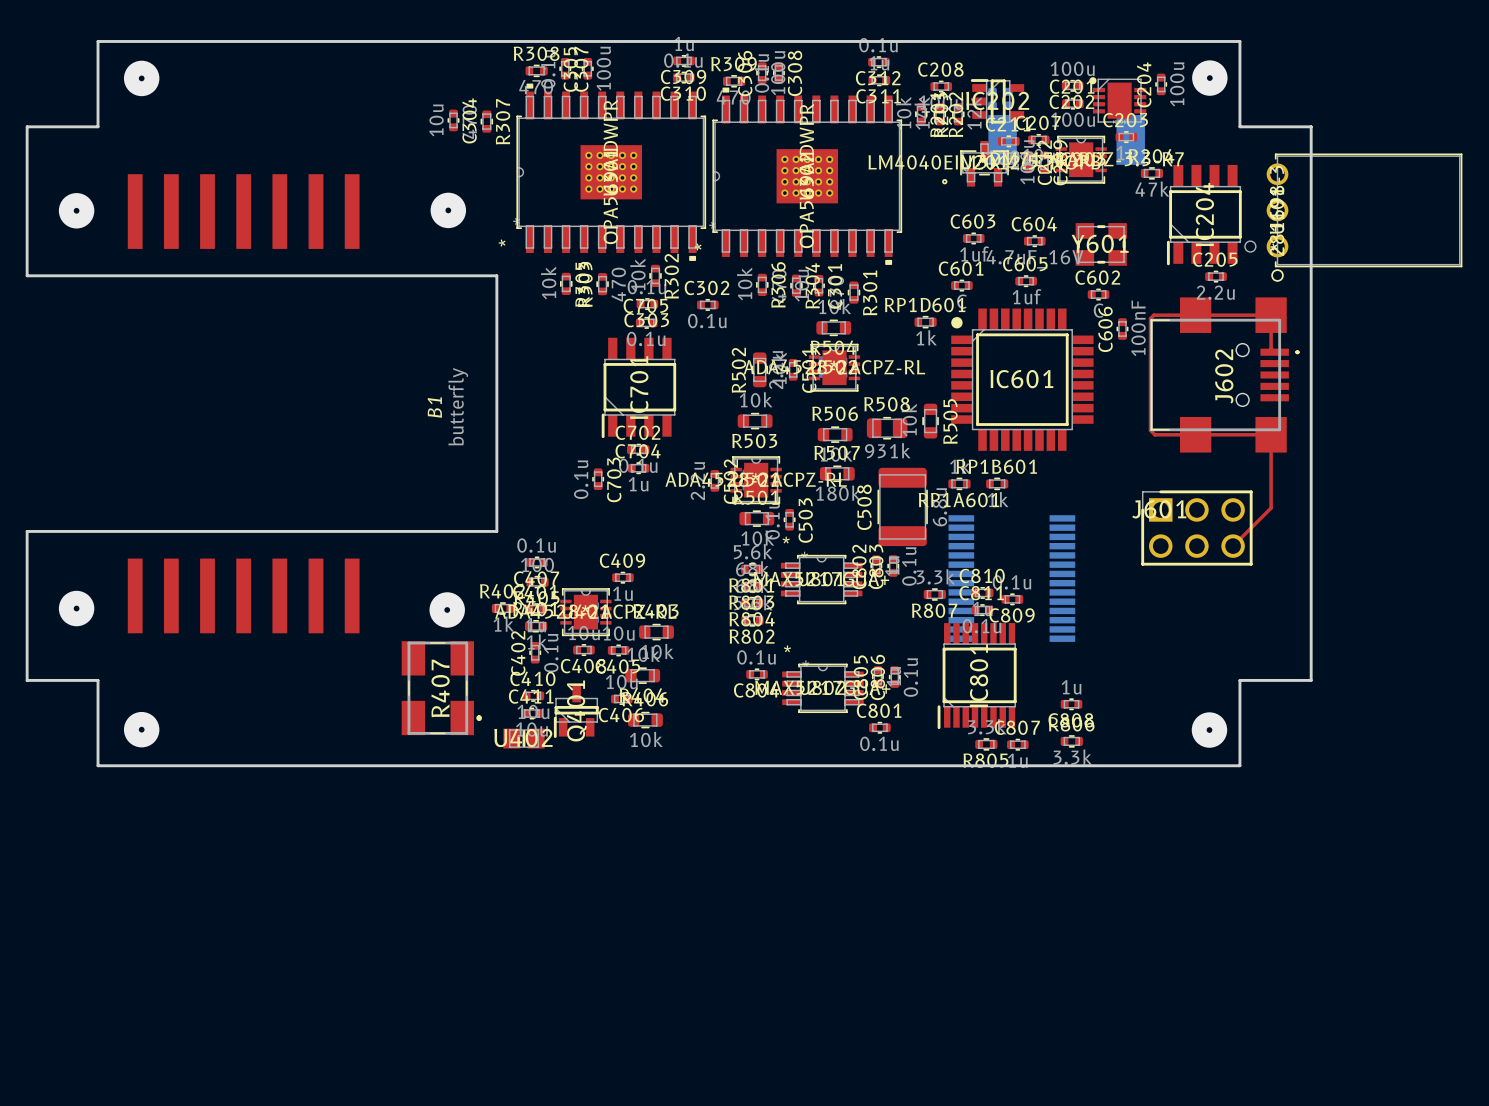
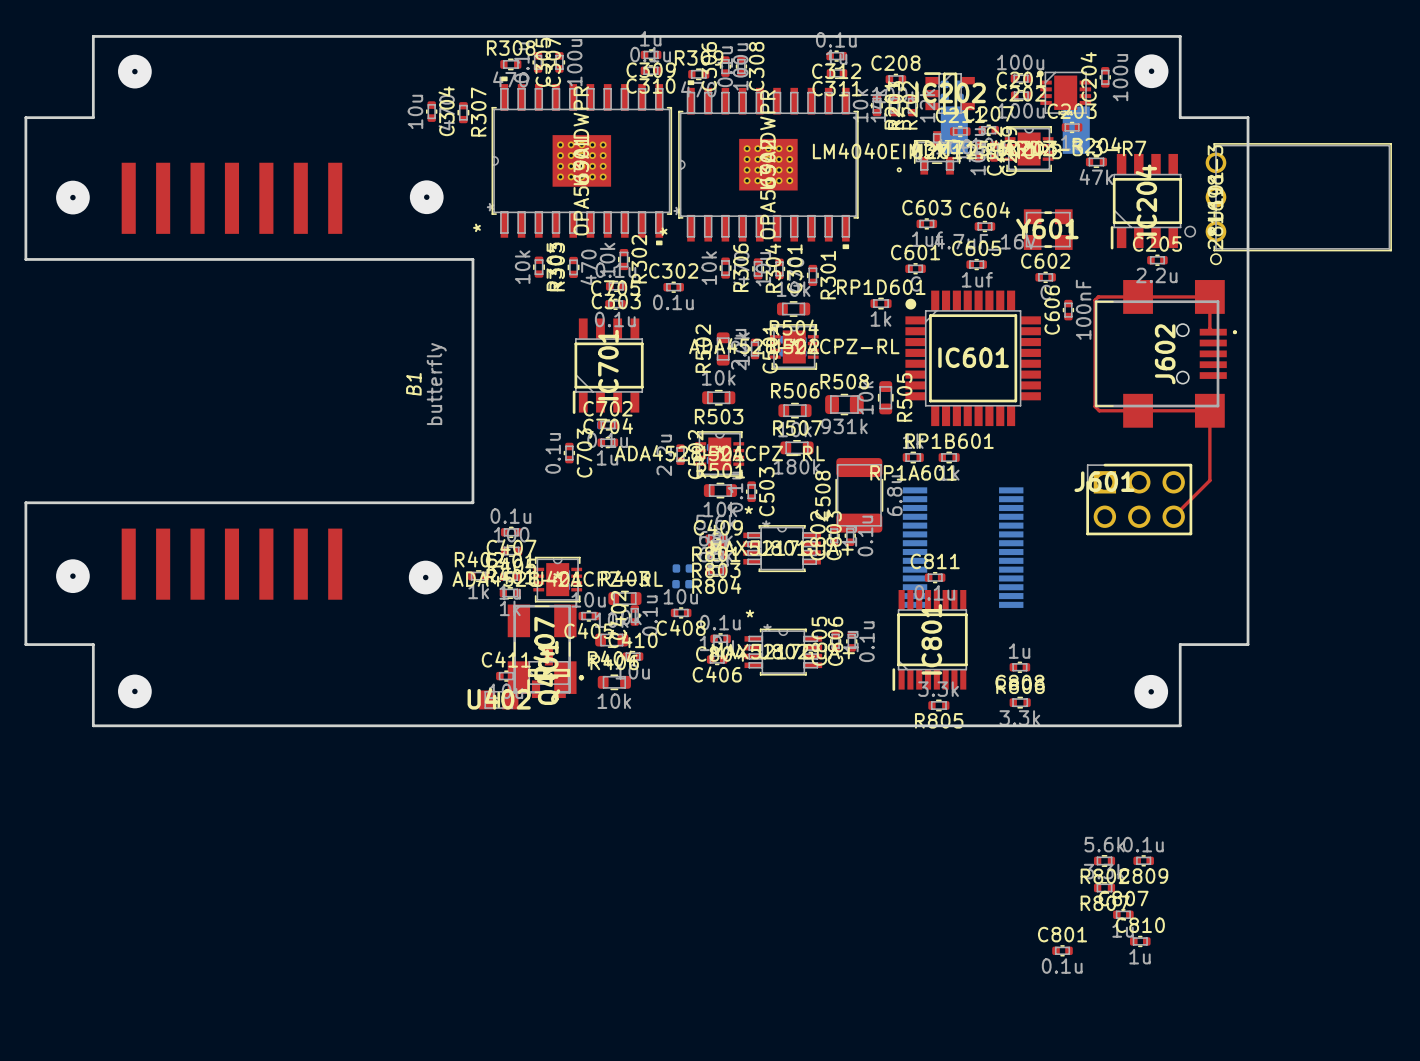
C508 position: (902, 506) -> (859, 495)
C409 position: (622, 577) -> (718, 544)
C810 position: (982, 592) -> (1140, 941)
R807 position: (934, 594) -> (1104, 887)
C809 position: (1012, 599) -> (1143, 860)
part: none -> (682, 568)
part: none -> (682, 584)
R802 position: (752, 620) -> (1104, 860)
C408 position: (583, 650) -> (681, 612)
C402 position: (535, 652) -> (634, 615)
R407 position: (441, 688) -> (545, 649)
C410 position: (533, 695) -> (633, 656)
C406 position: (621, 699) -> (717, 659)
C801 position: (879, 727) -> (1062, 950)
C807 position: (1017, 744) -> (1123, 914)

